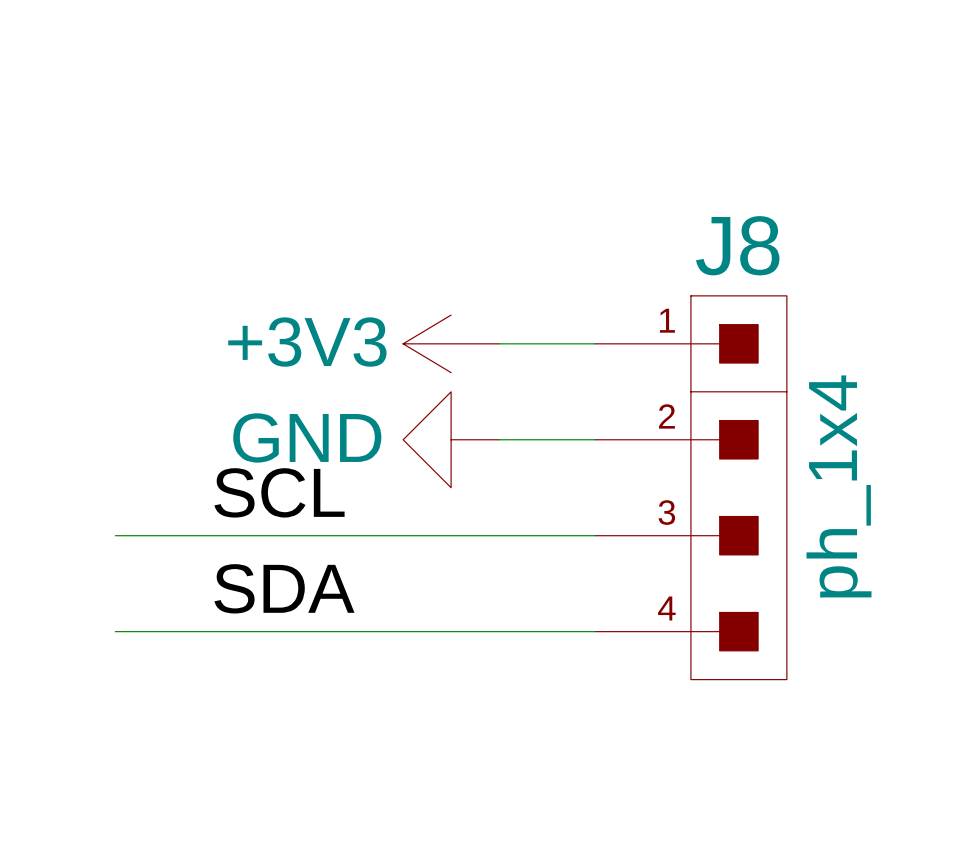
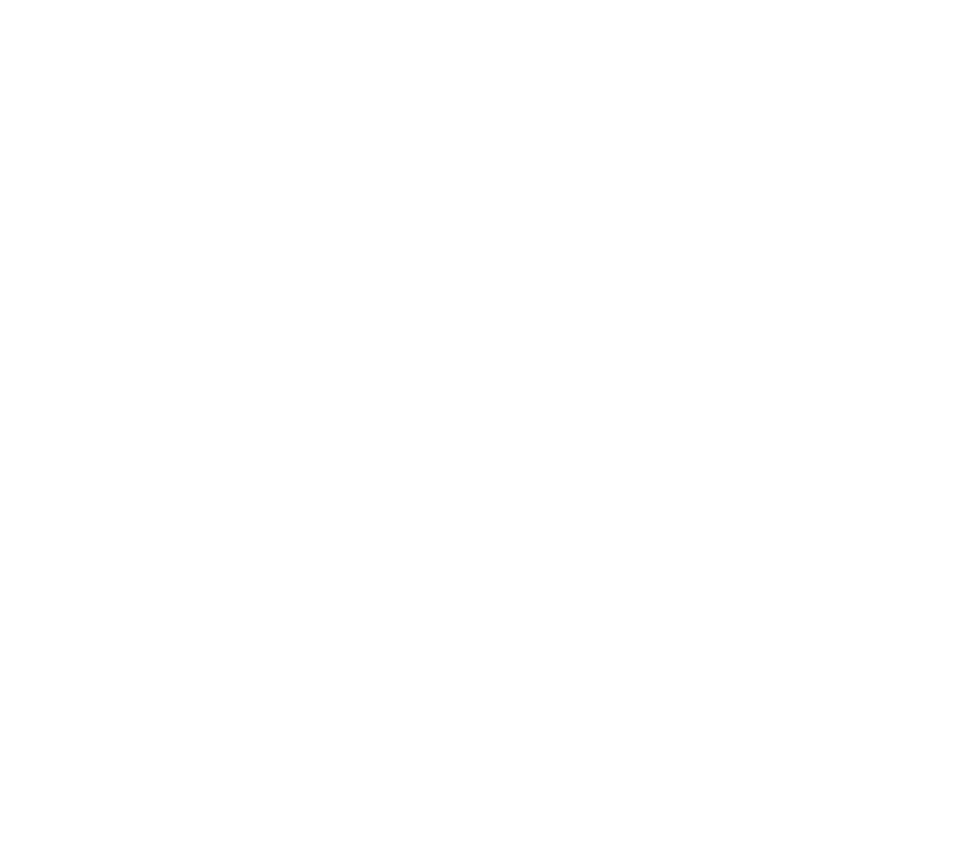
power symbol: +3V3 (451, 343) -> none
wire: (499, 343) (595, 343) -> none
power symbol: GND (451, 439) -> none
wire: (499, 439) (595, 439) -> none
J8: ph_1x4 (690, 487) -> none
label: SCL (279, 492) -> none
wire: (115, 535) (595, 535) -> none
label: SDA (284, 588) -> none
wire: (115, 631) (595, 631) -> none

